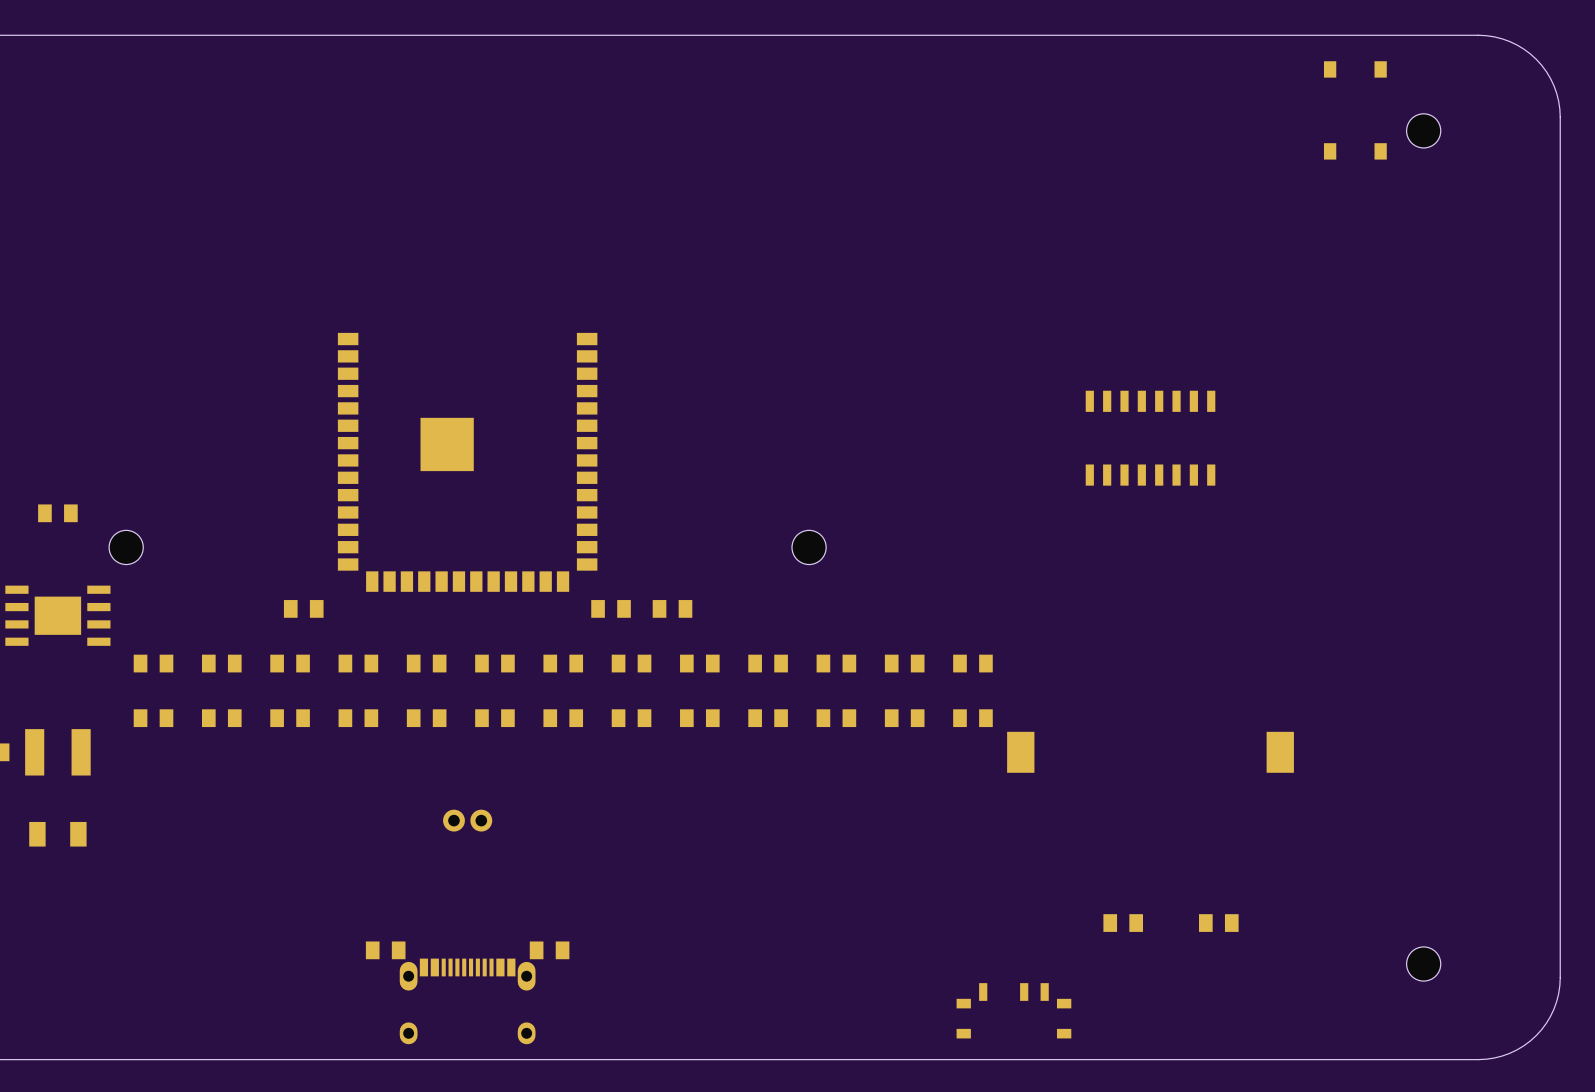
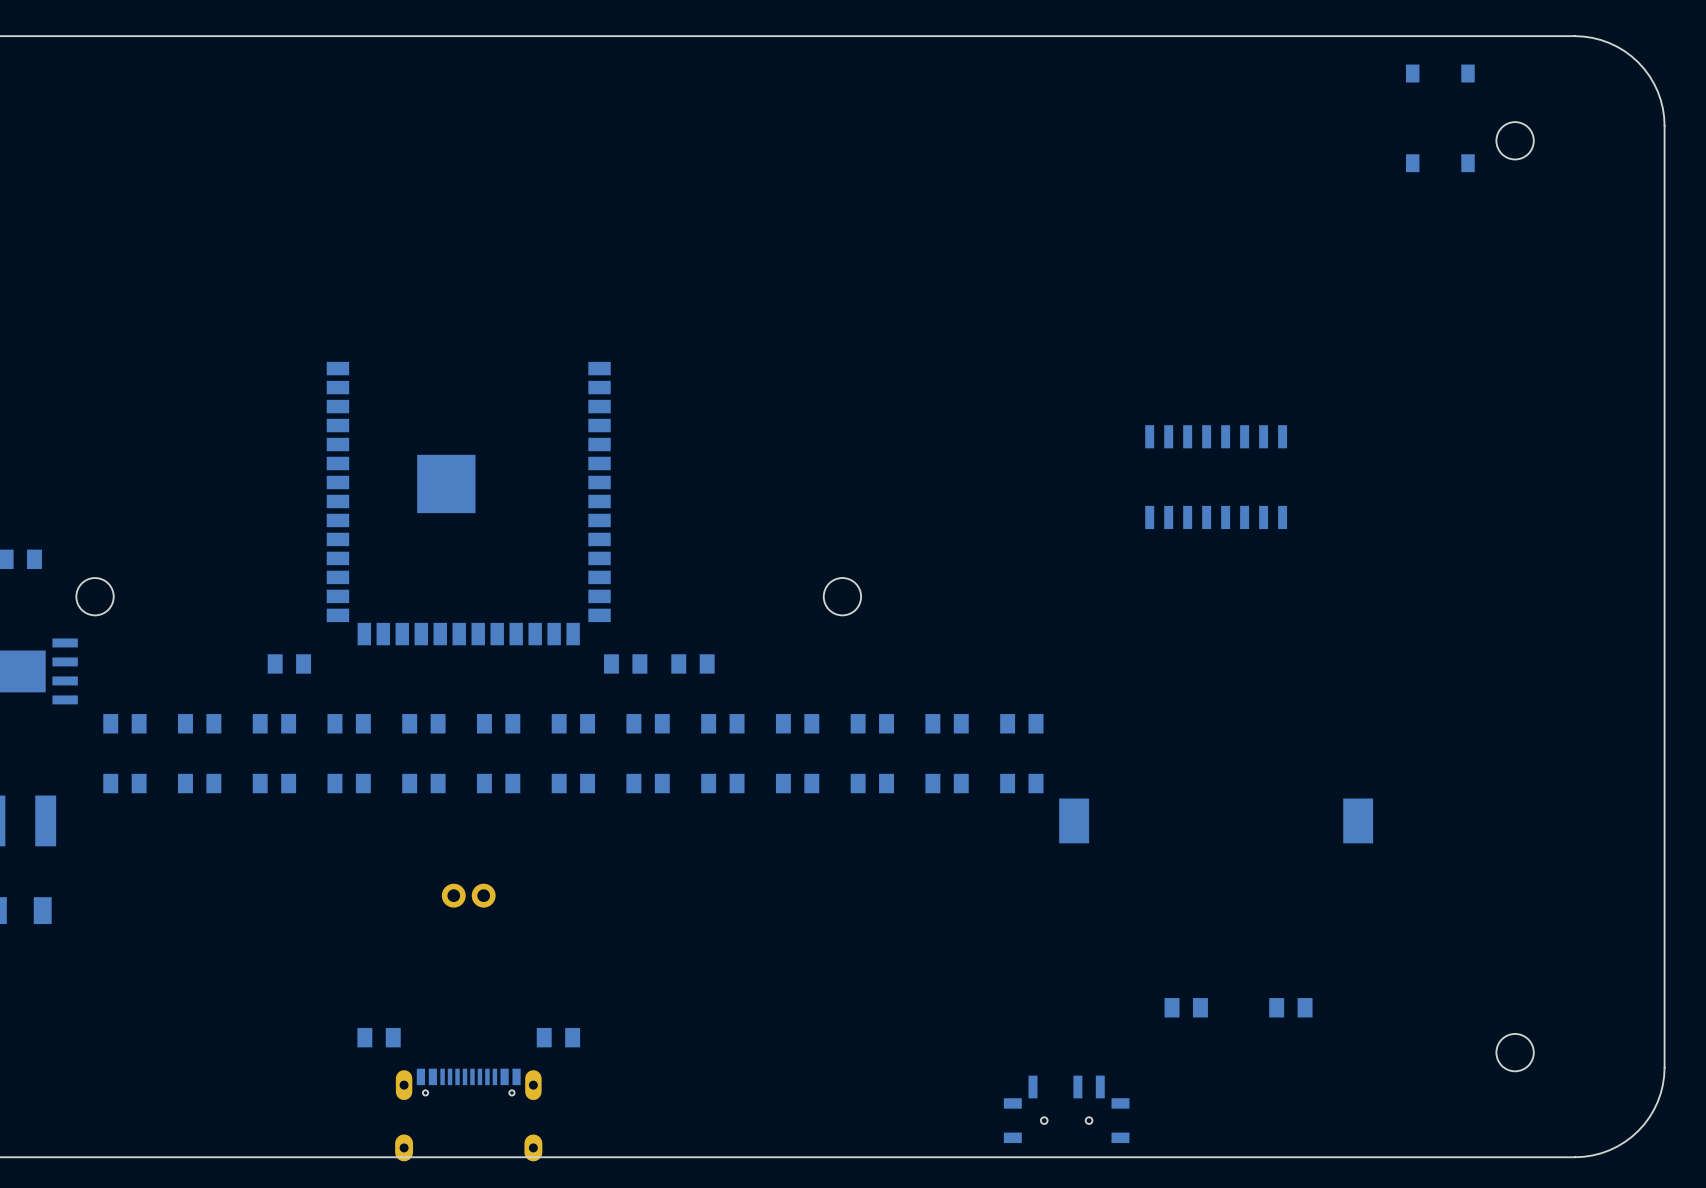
part footprint: [956, 983, 1072, 1039] -> [1003, 1075, 1130, 1144]
part: (467, 1001) -> none
part: none -> (468, 1115)

